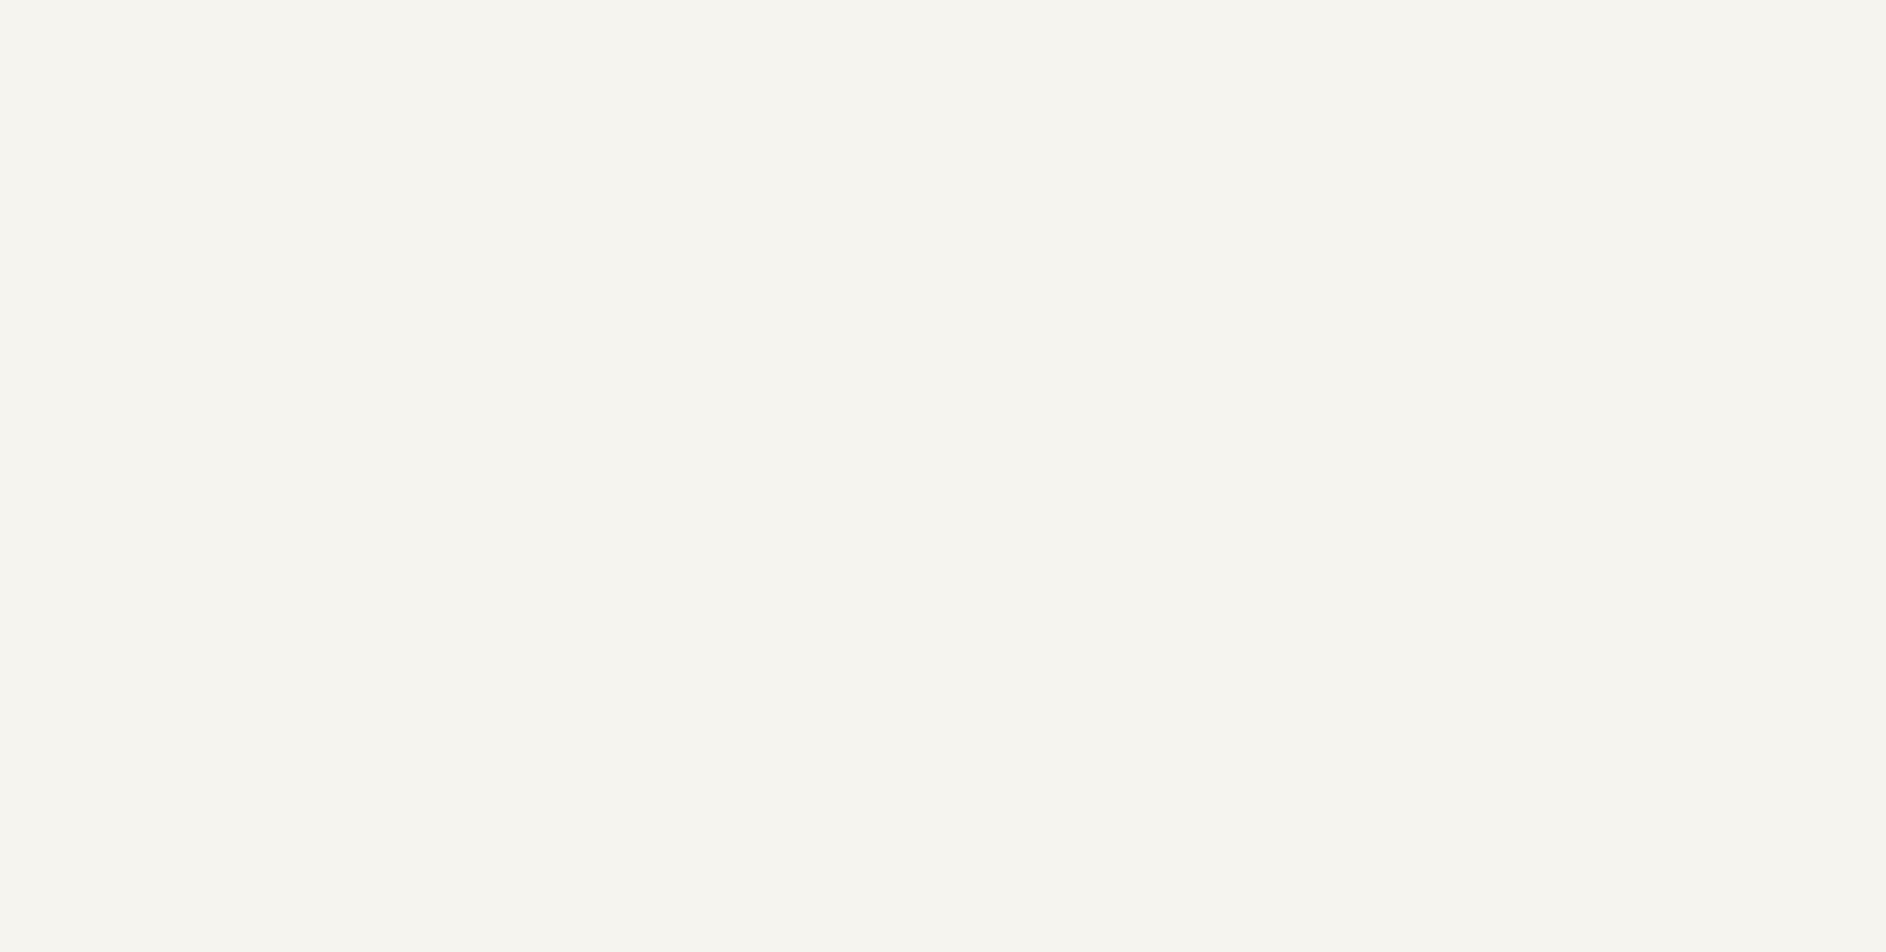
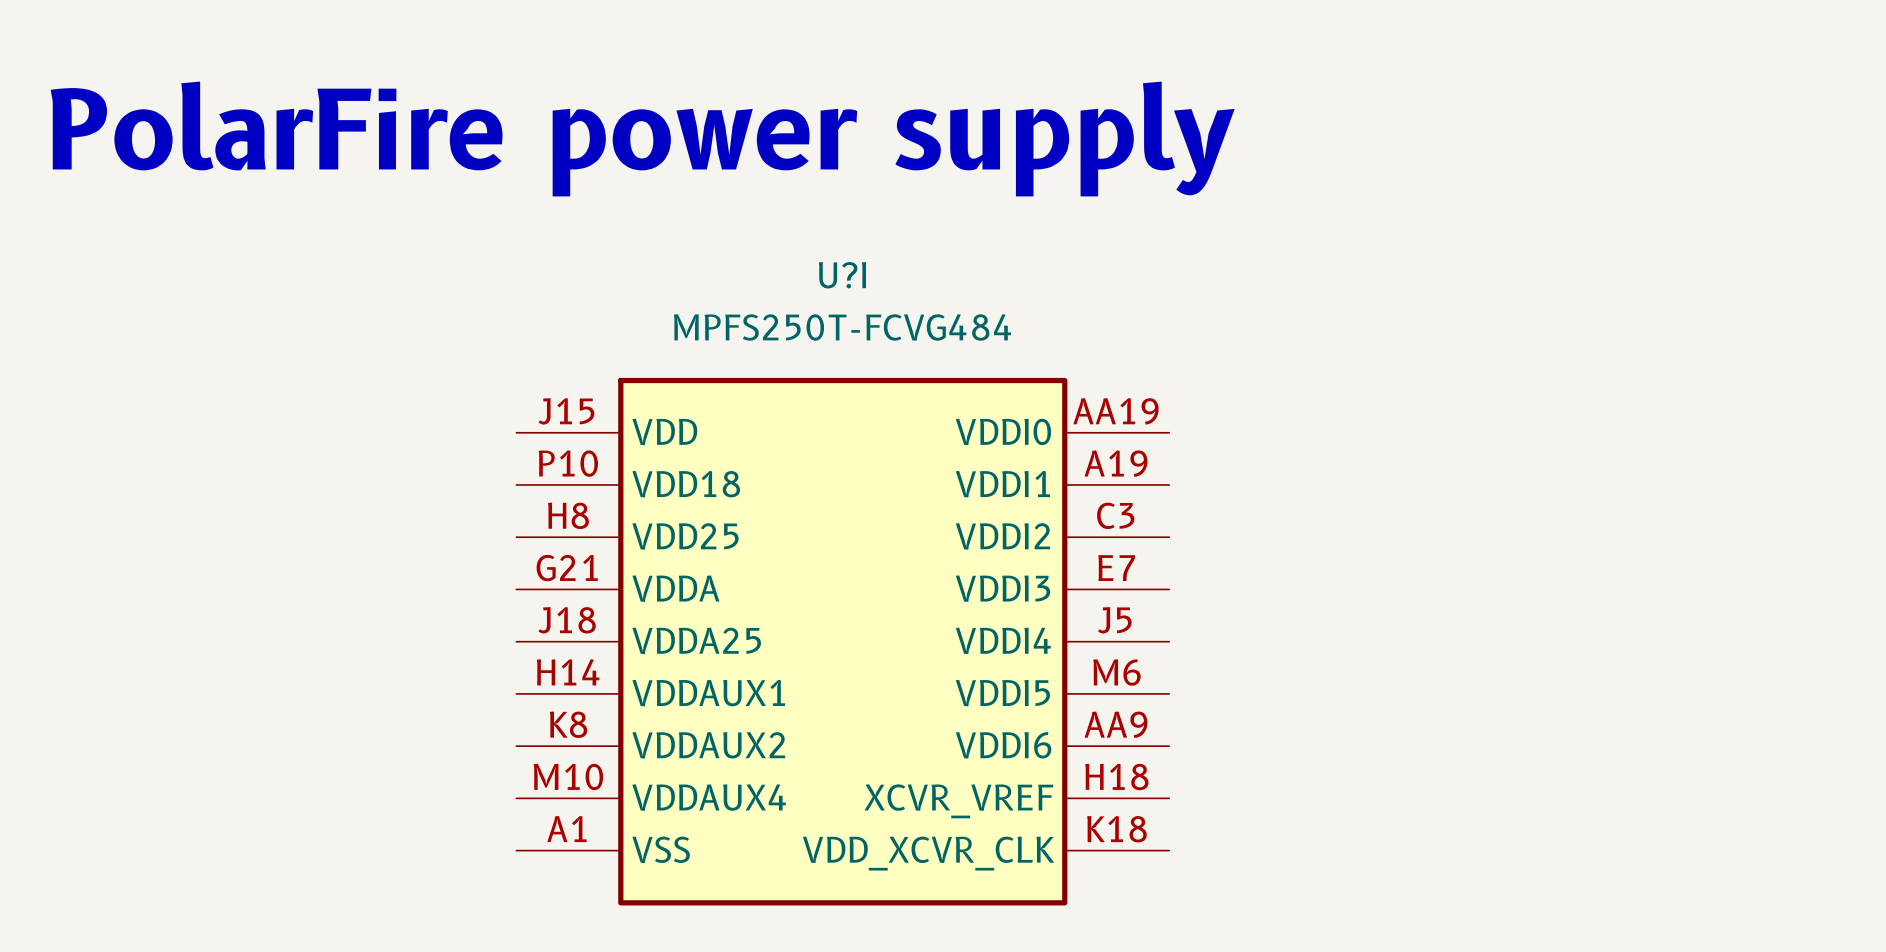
text: none -> PolarFire power supply (642, 139)
U?I: none -> (842, 641)

